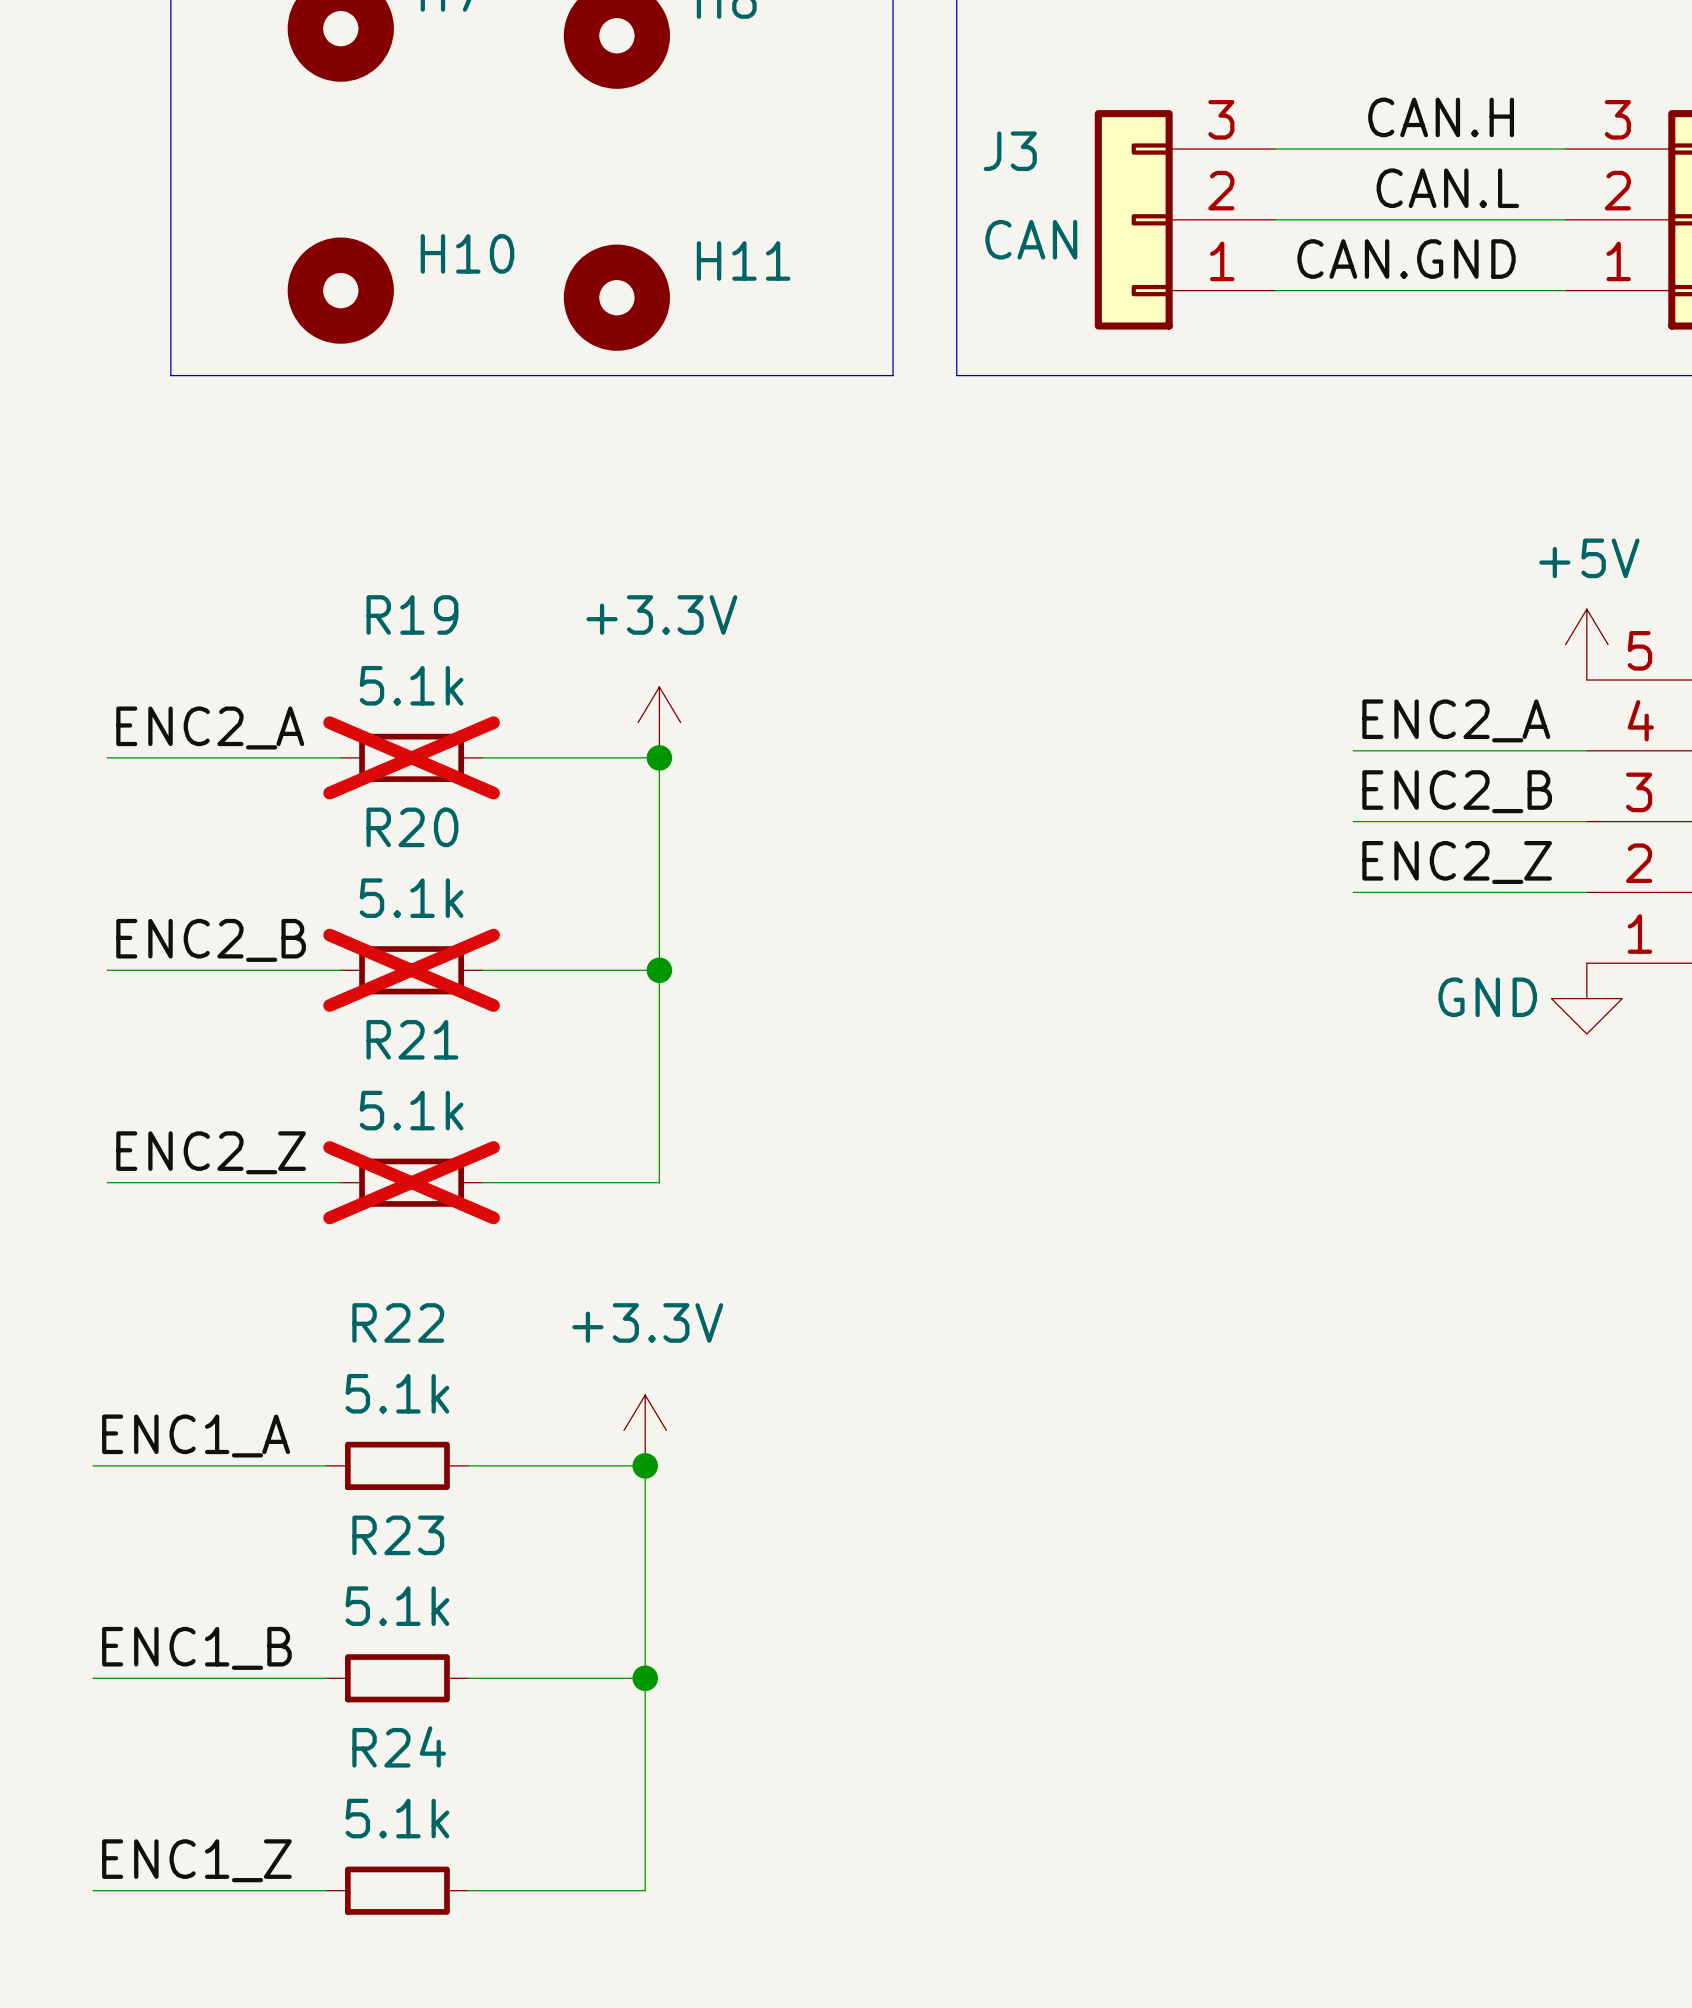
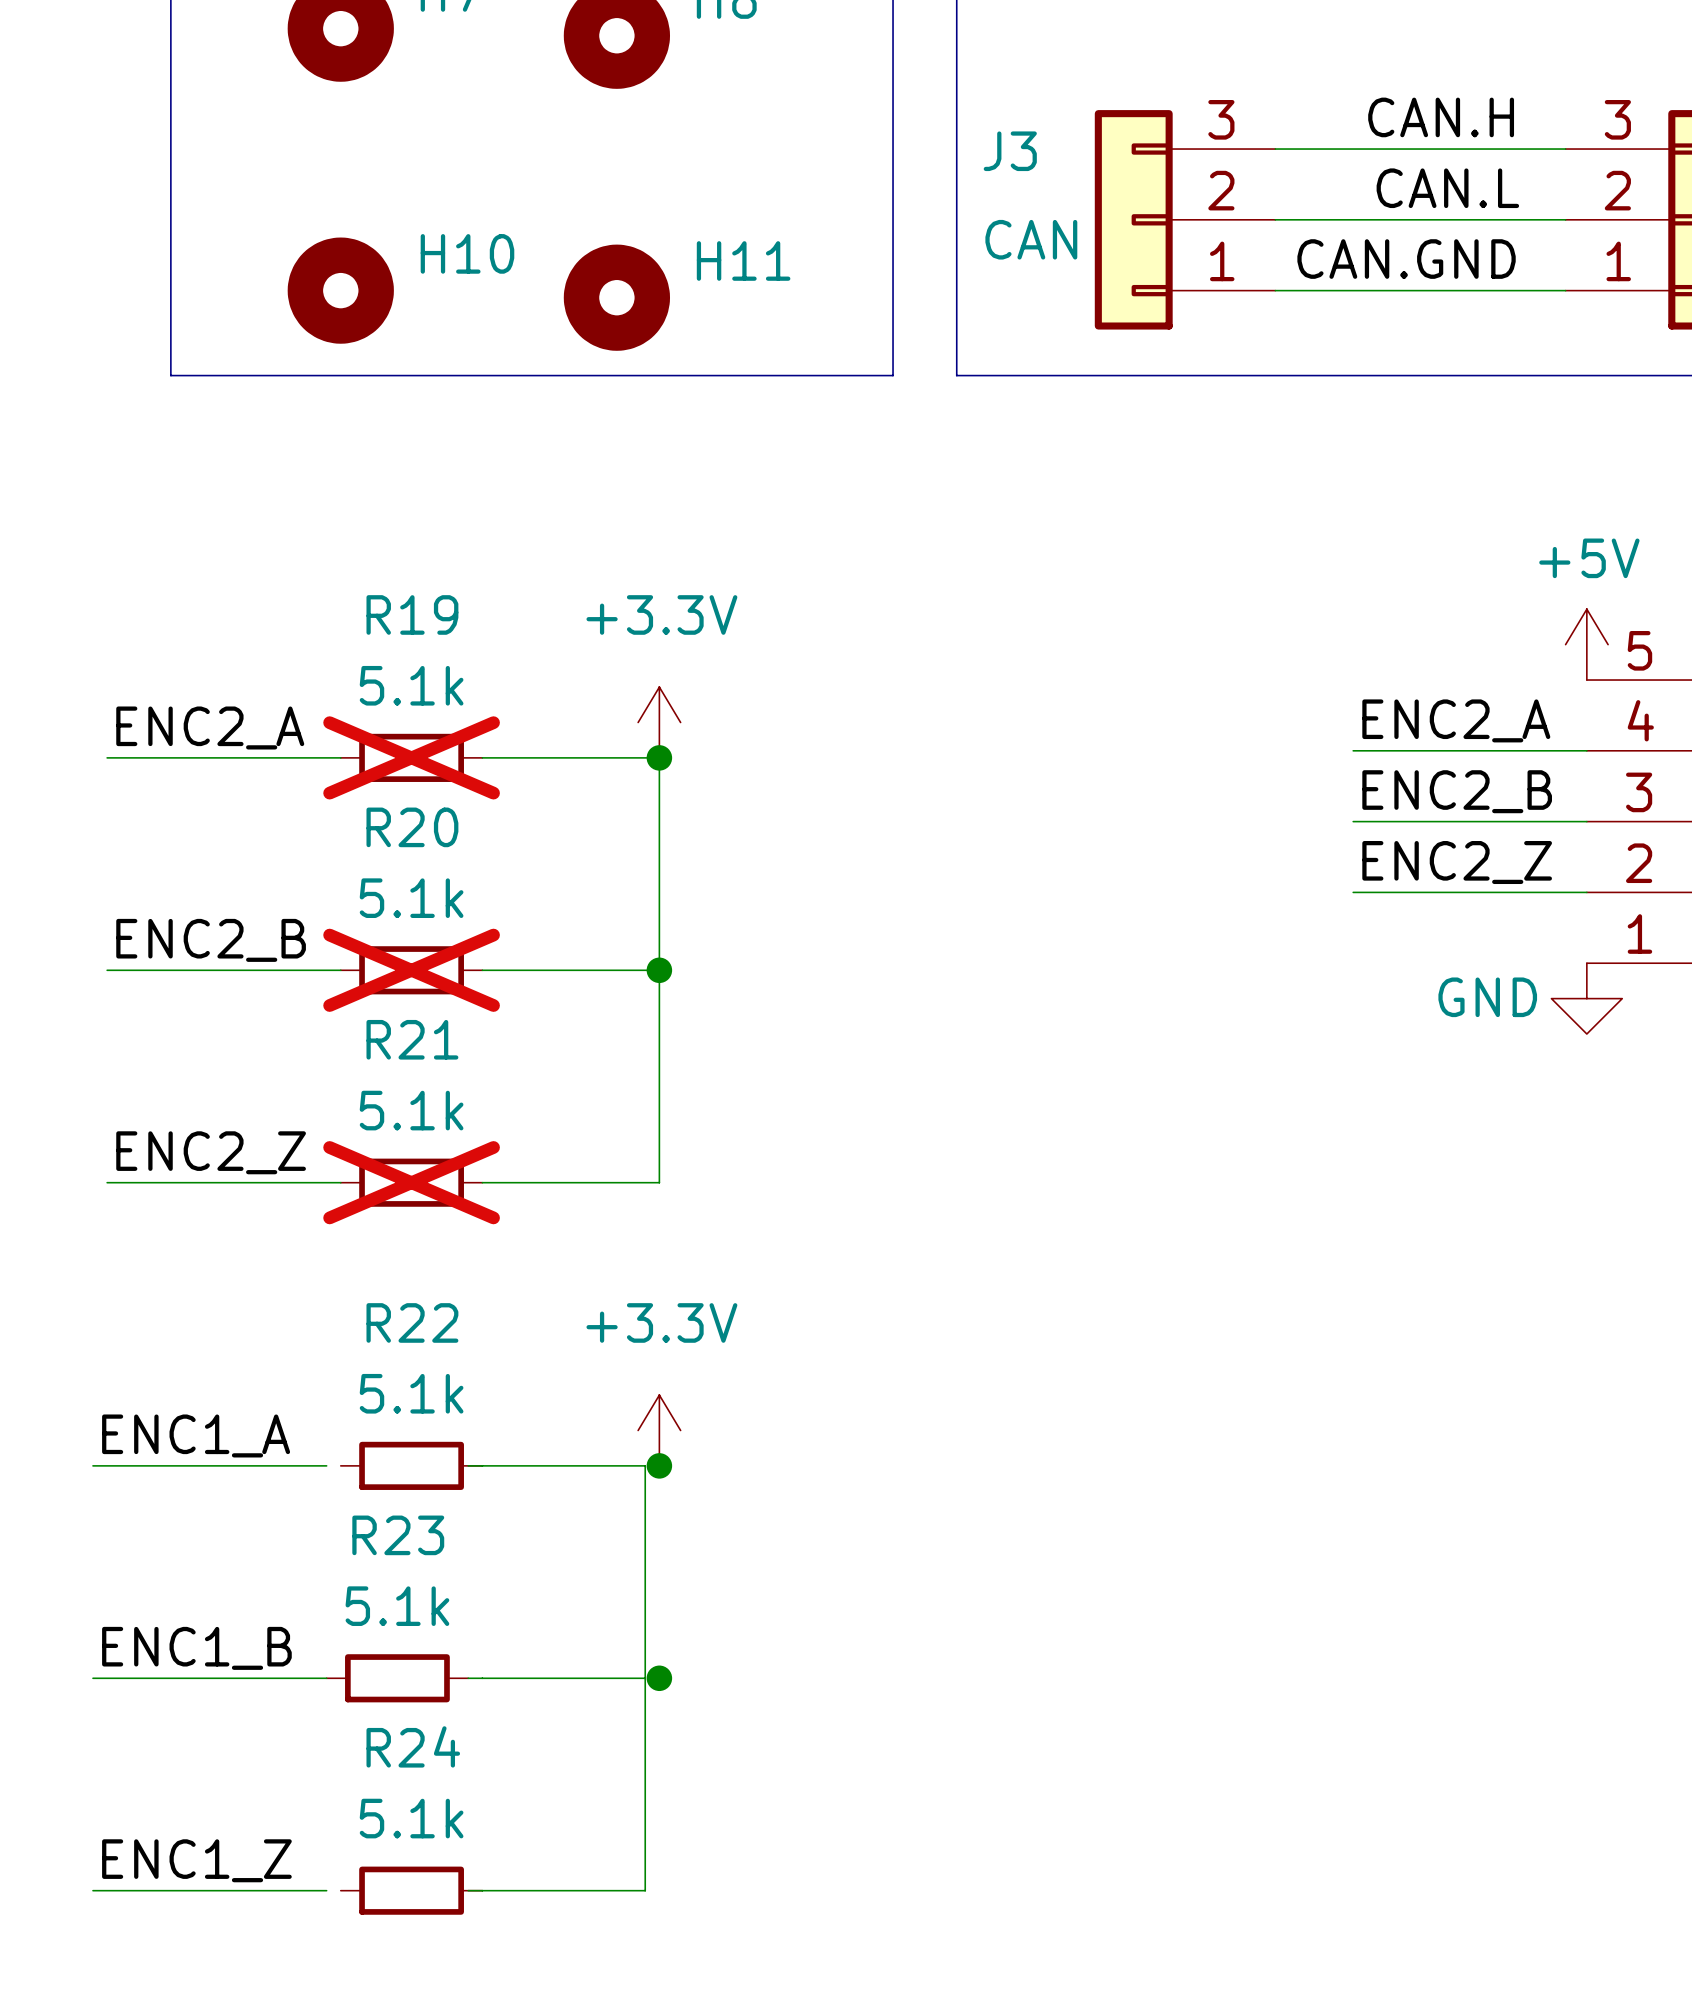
power symbol position: +3.3V (645, 1430) -> +3.3V (659, 1430)
R22 position: (397, 1465) -> (411, 1465)
junction position: (645, 1465) -> (659, 1465)
junction position: (645, 1678) -> (659, 1678)
R24 position: (397, 1890) -> (411, 1890)

